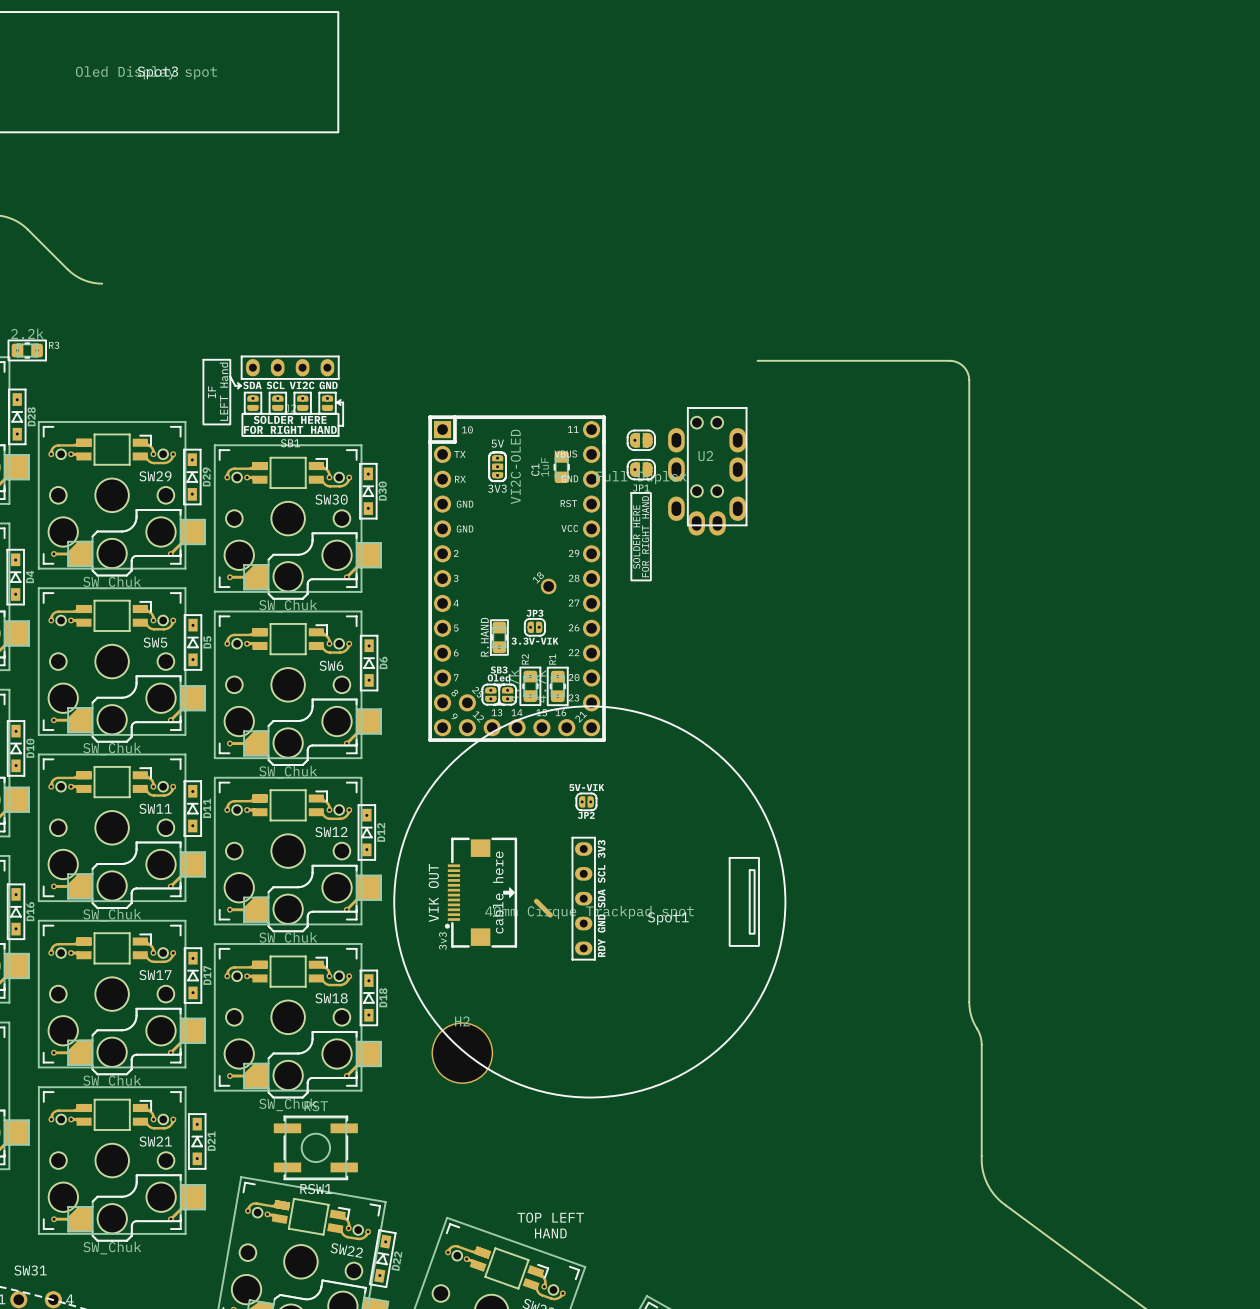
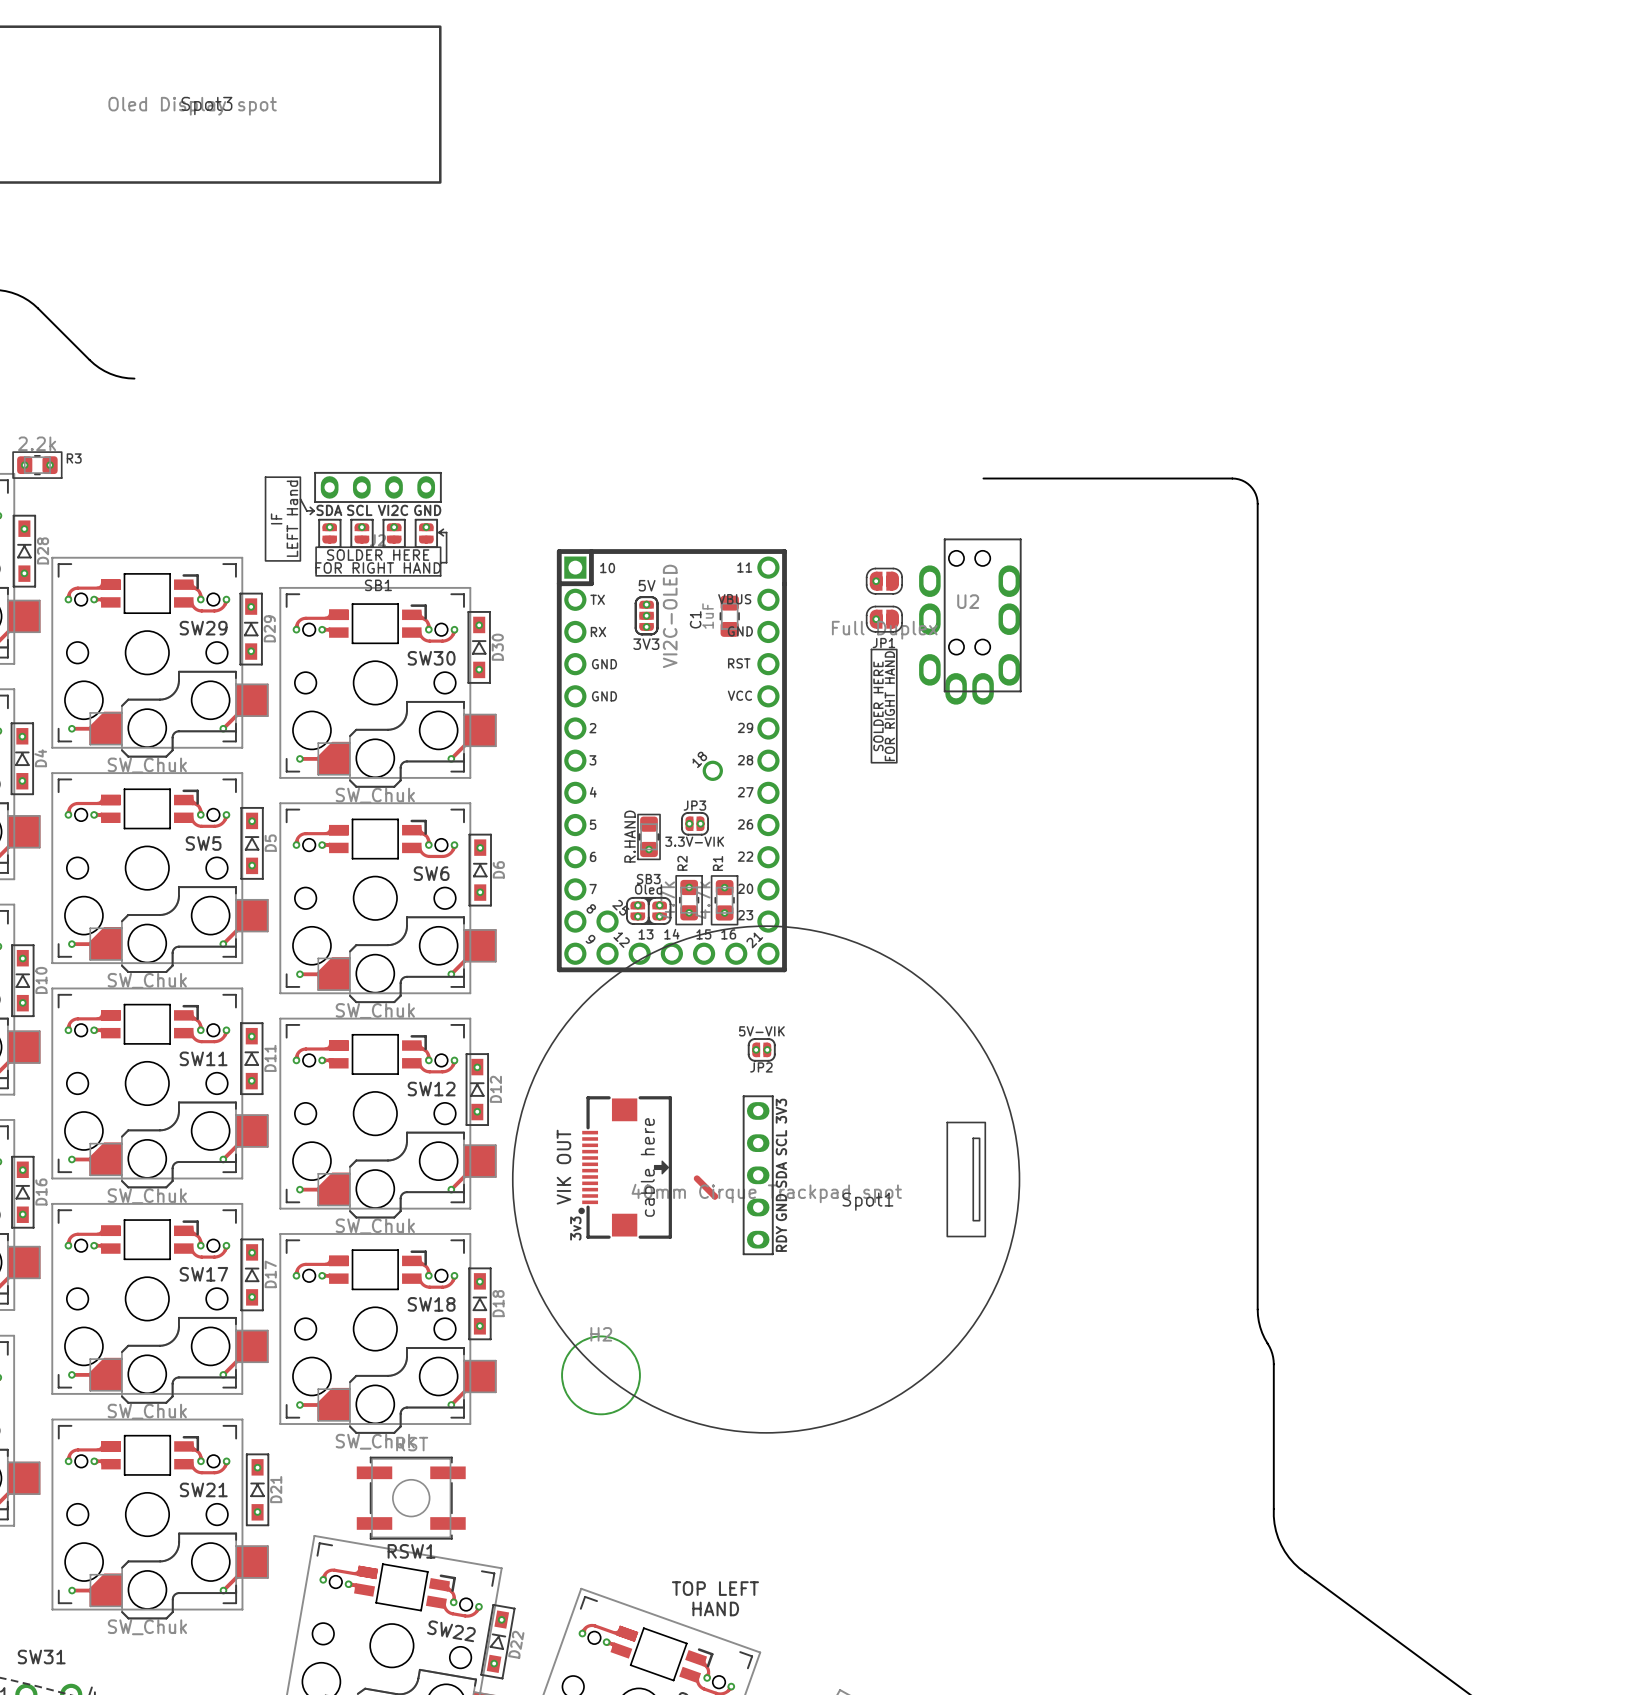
U2 position: (707, 471) -> (970, 621)
JP1 position: (641, 505) -> (884, 665)

